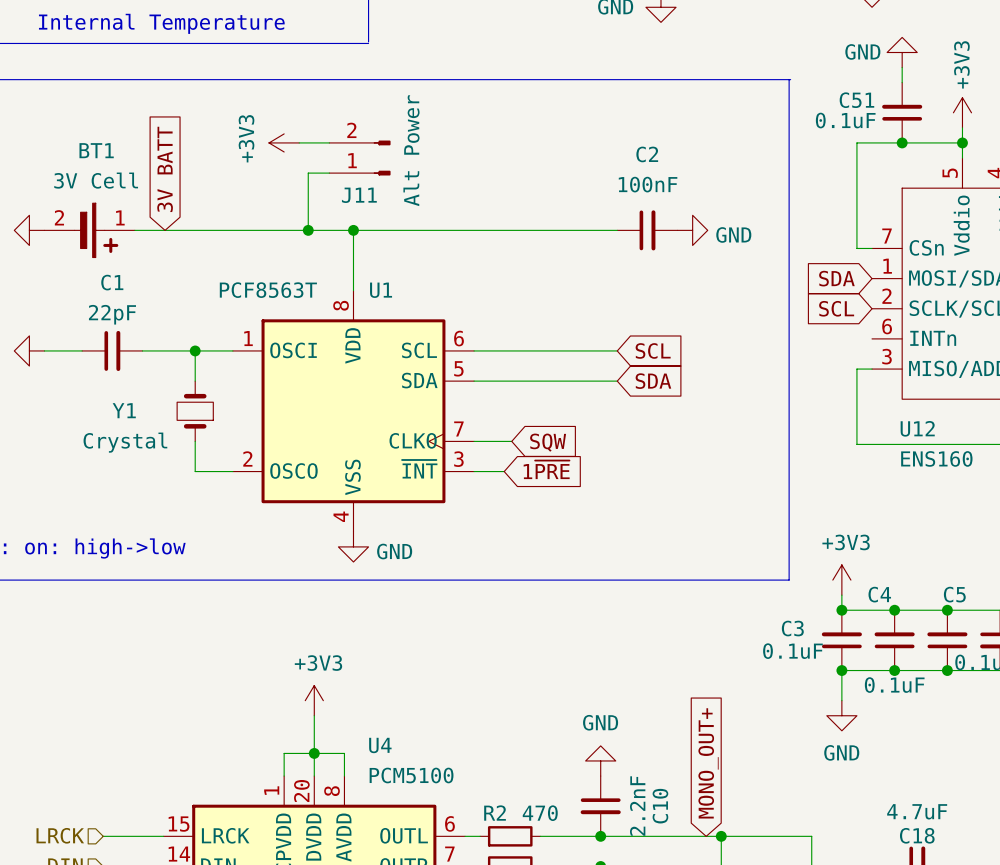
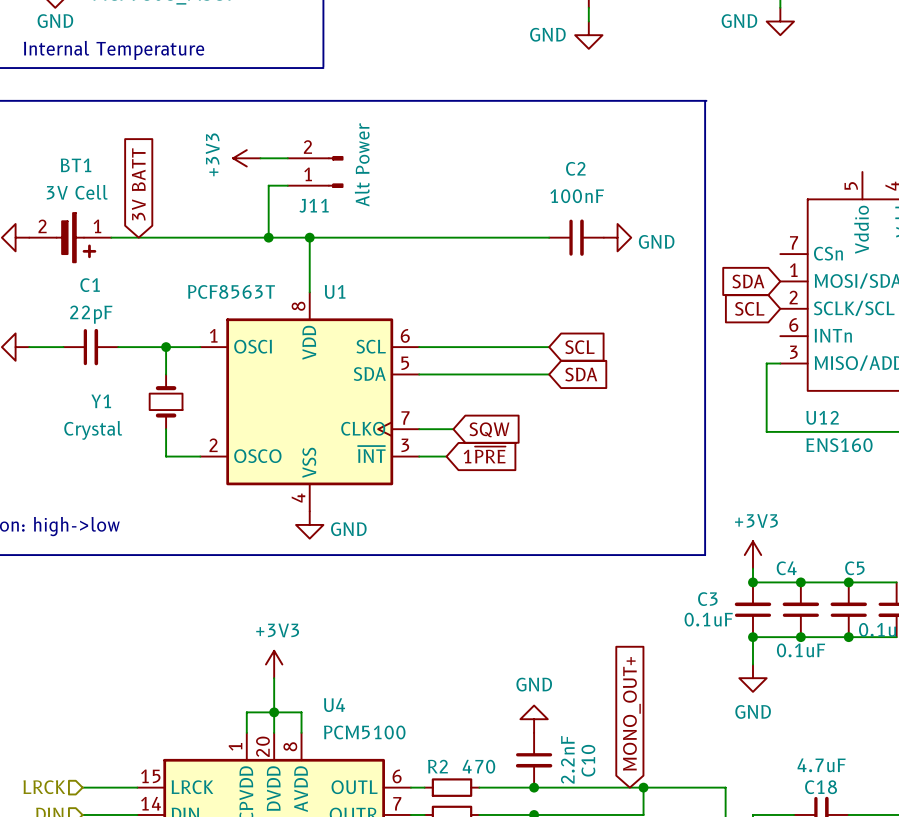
power symbol: GND (902, 52) -> none
wire: (902, 67) (902, 82) -> none
C51: 0.1uF (902, 112) -> none
power symbol: +3V3 (962, 112) -> none
wire: (962, 127) (962, 158) -> none
junction: (902, 142) -> none
wire: (962, 142) (856, 142) (856, 248) (872, 248) -> none
junction: (962, 142) -> none

